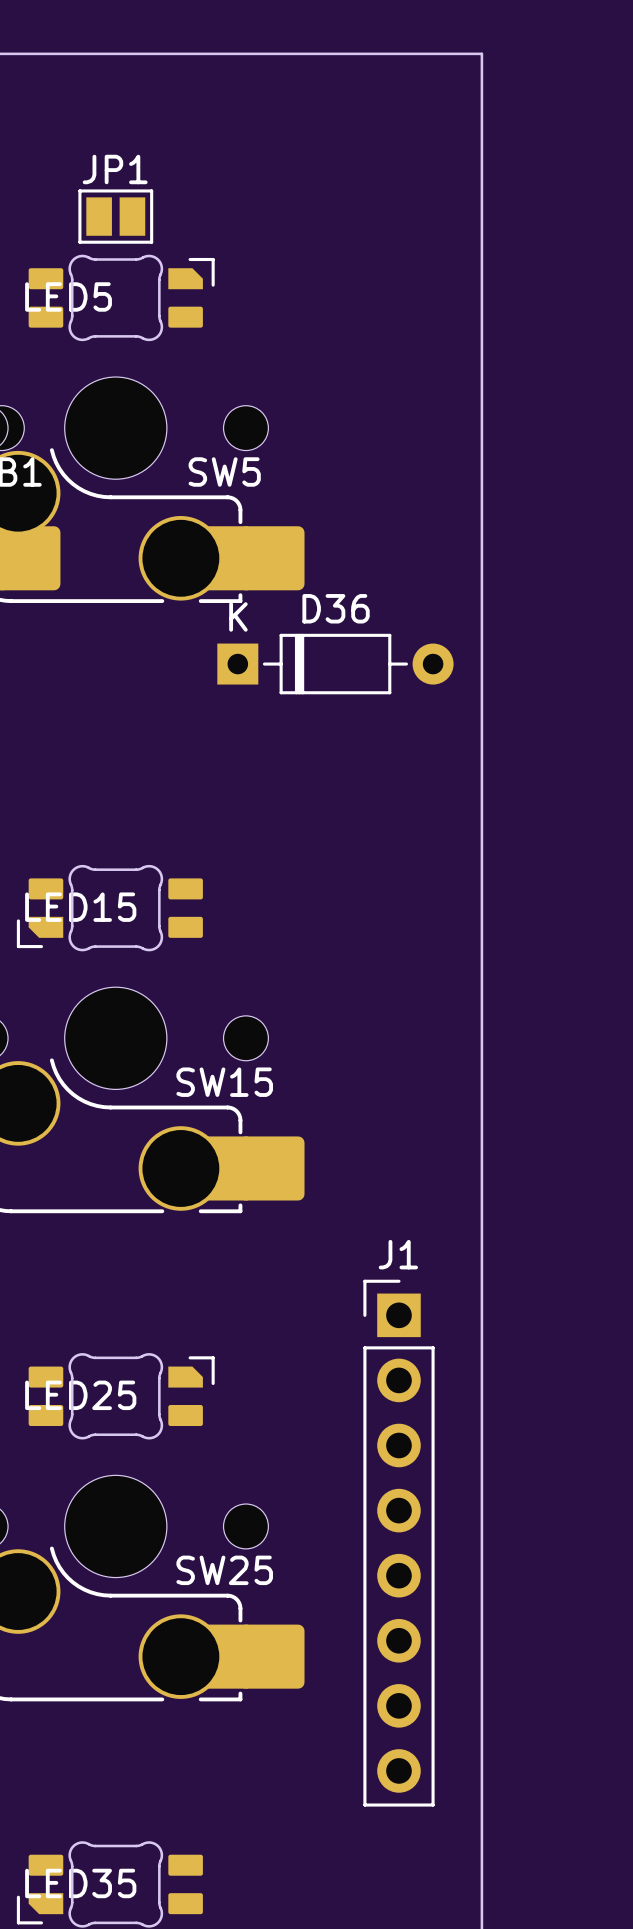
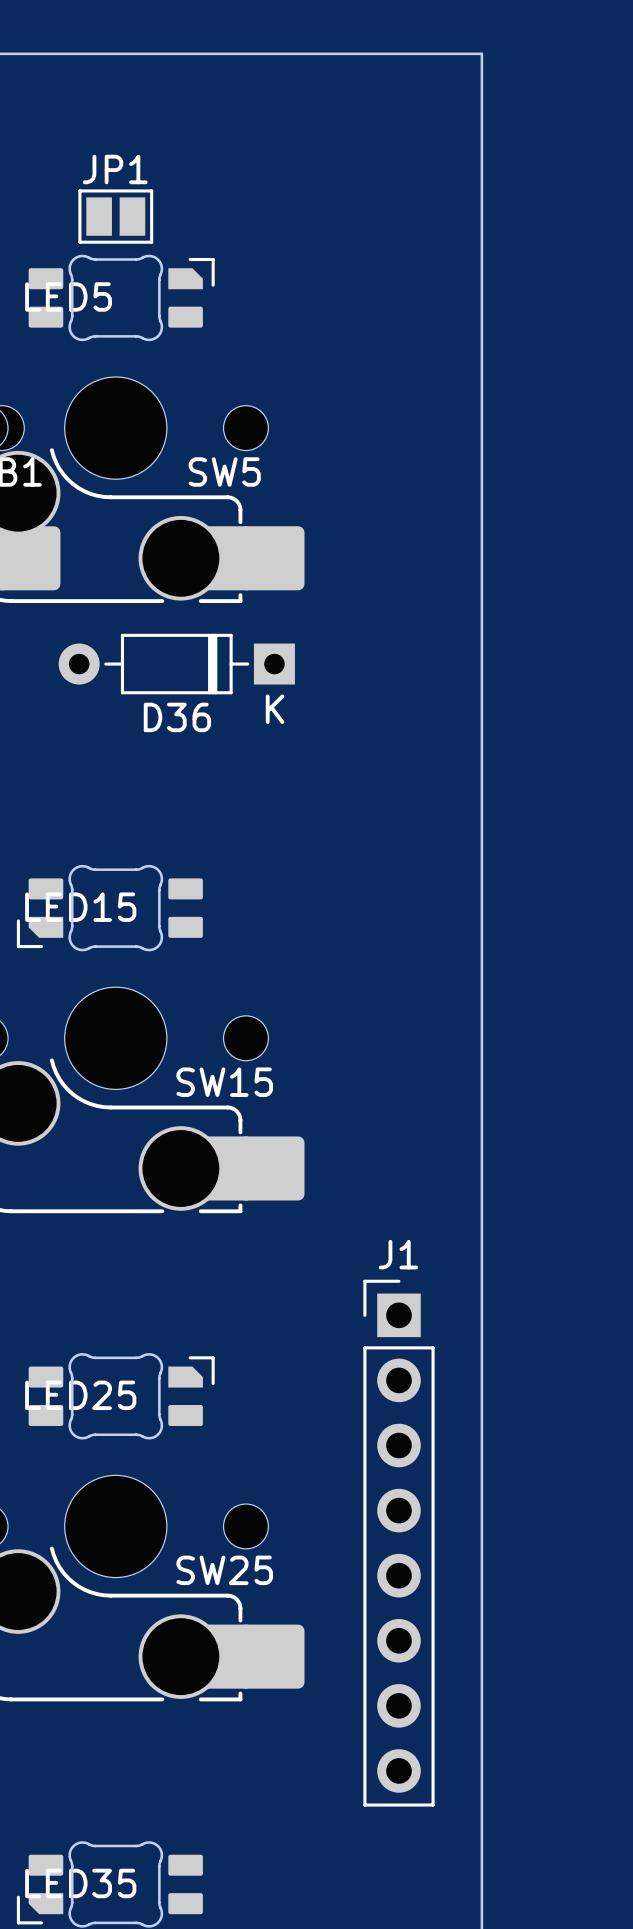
D36 rotation: 0° (335, 664) -> 180° (176, 664)
D36 position: (335, 664) -> (176, 664)

